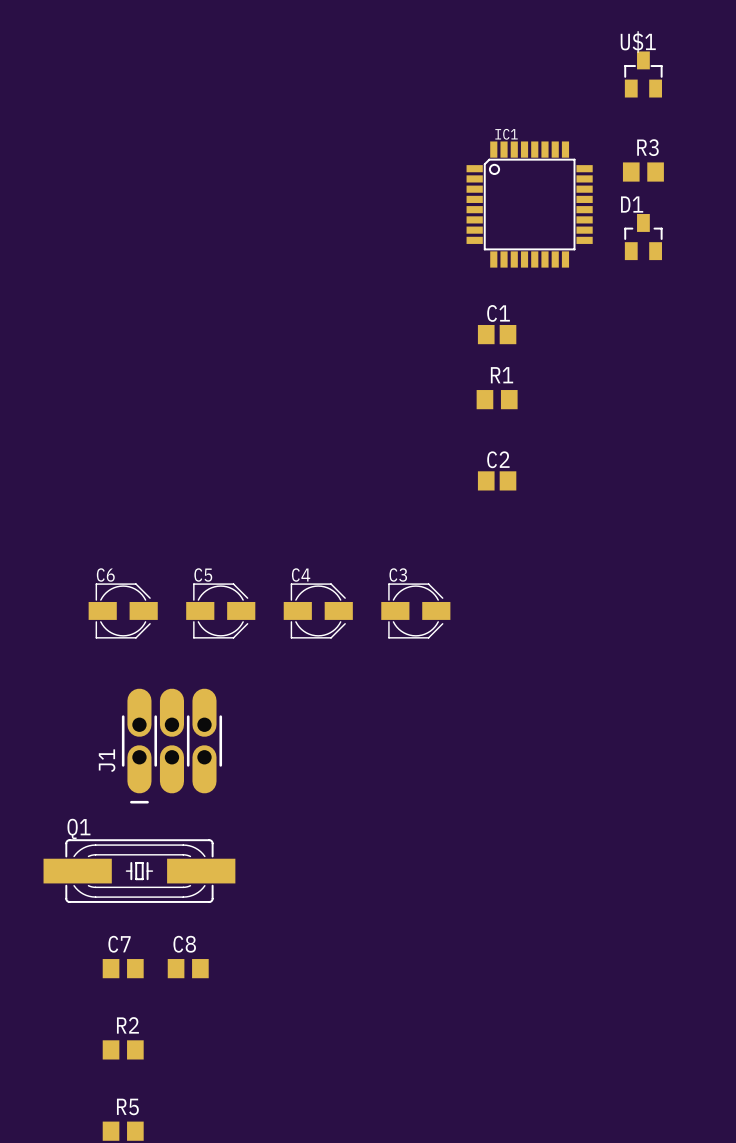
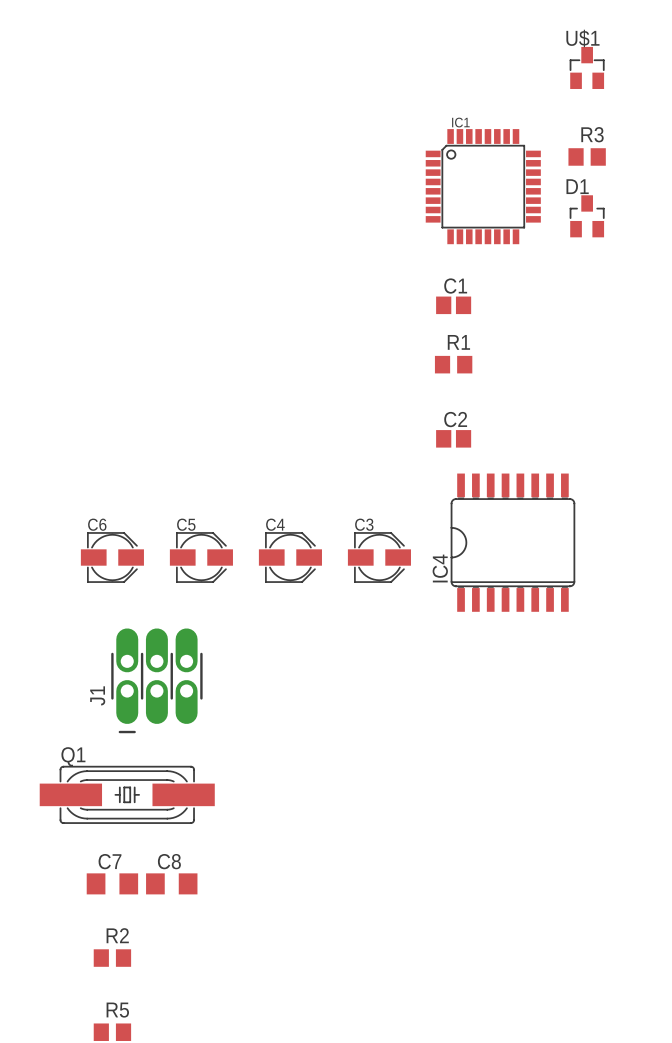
IC4: none -> (512, 542)
C7 footprint: [102, 959, 144, 979] -> [86, 873, 139, 895]
C8 footprint: [167, 959, 209, 979] -> [146, 873, 198, 895]

